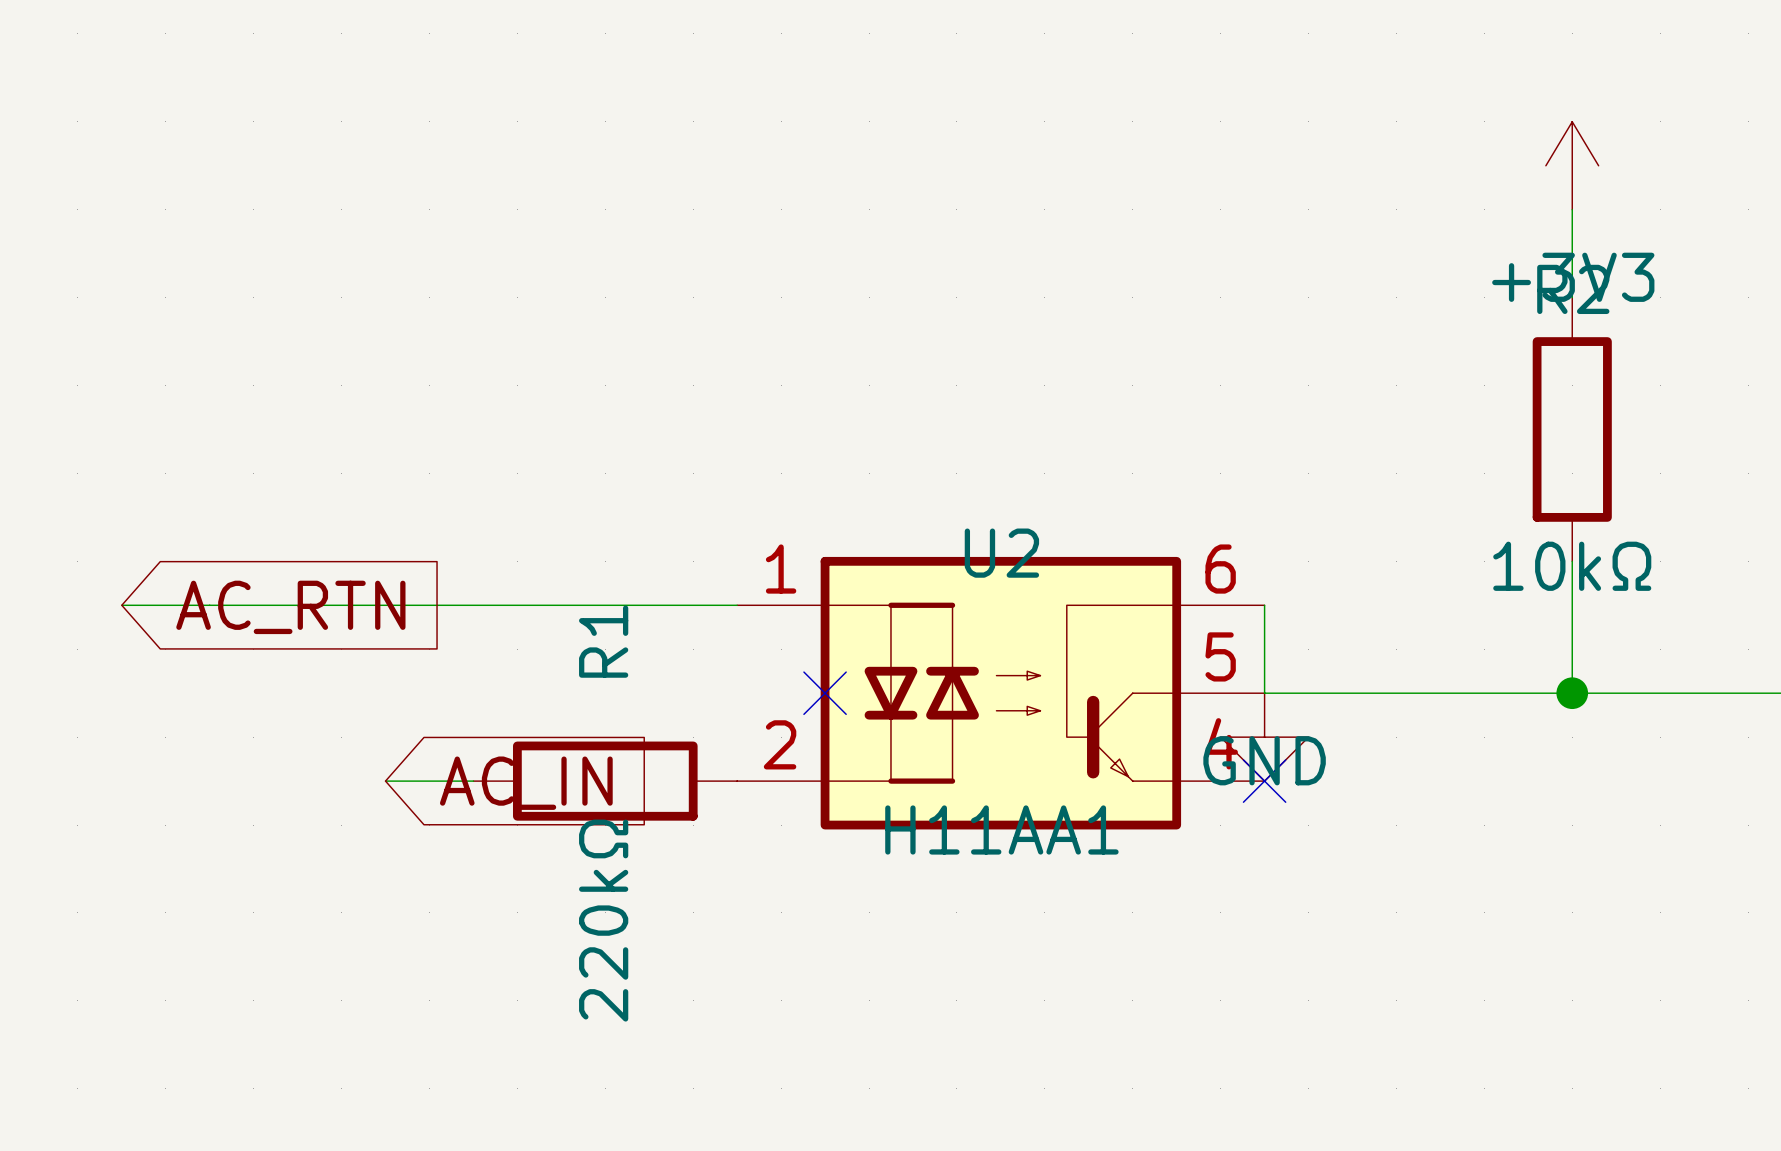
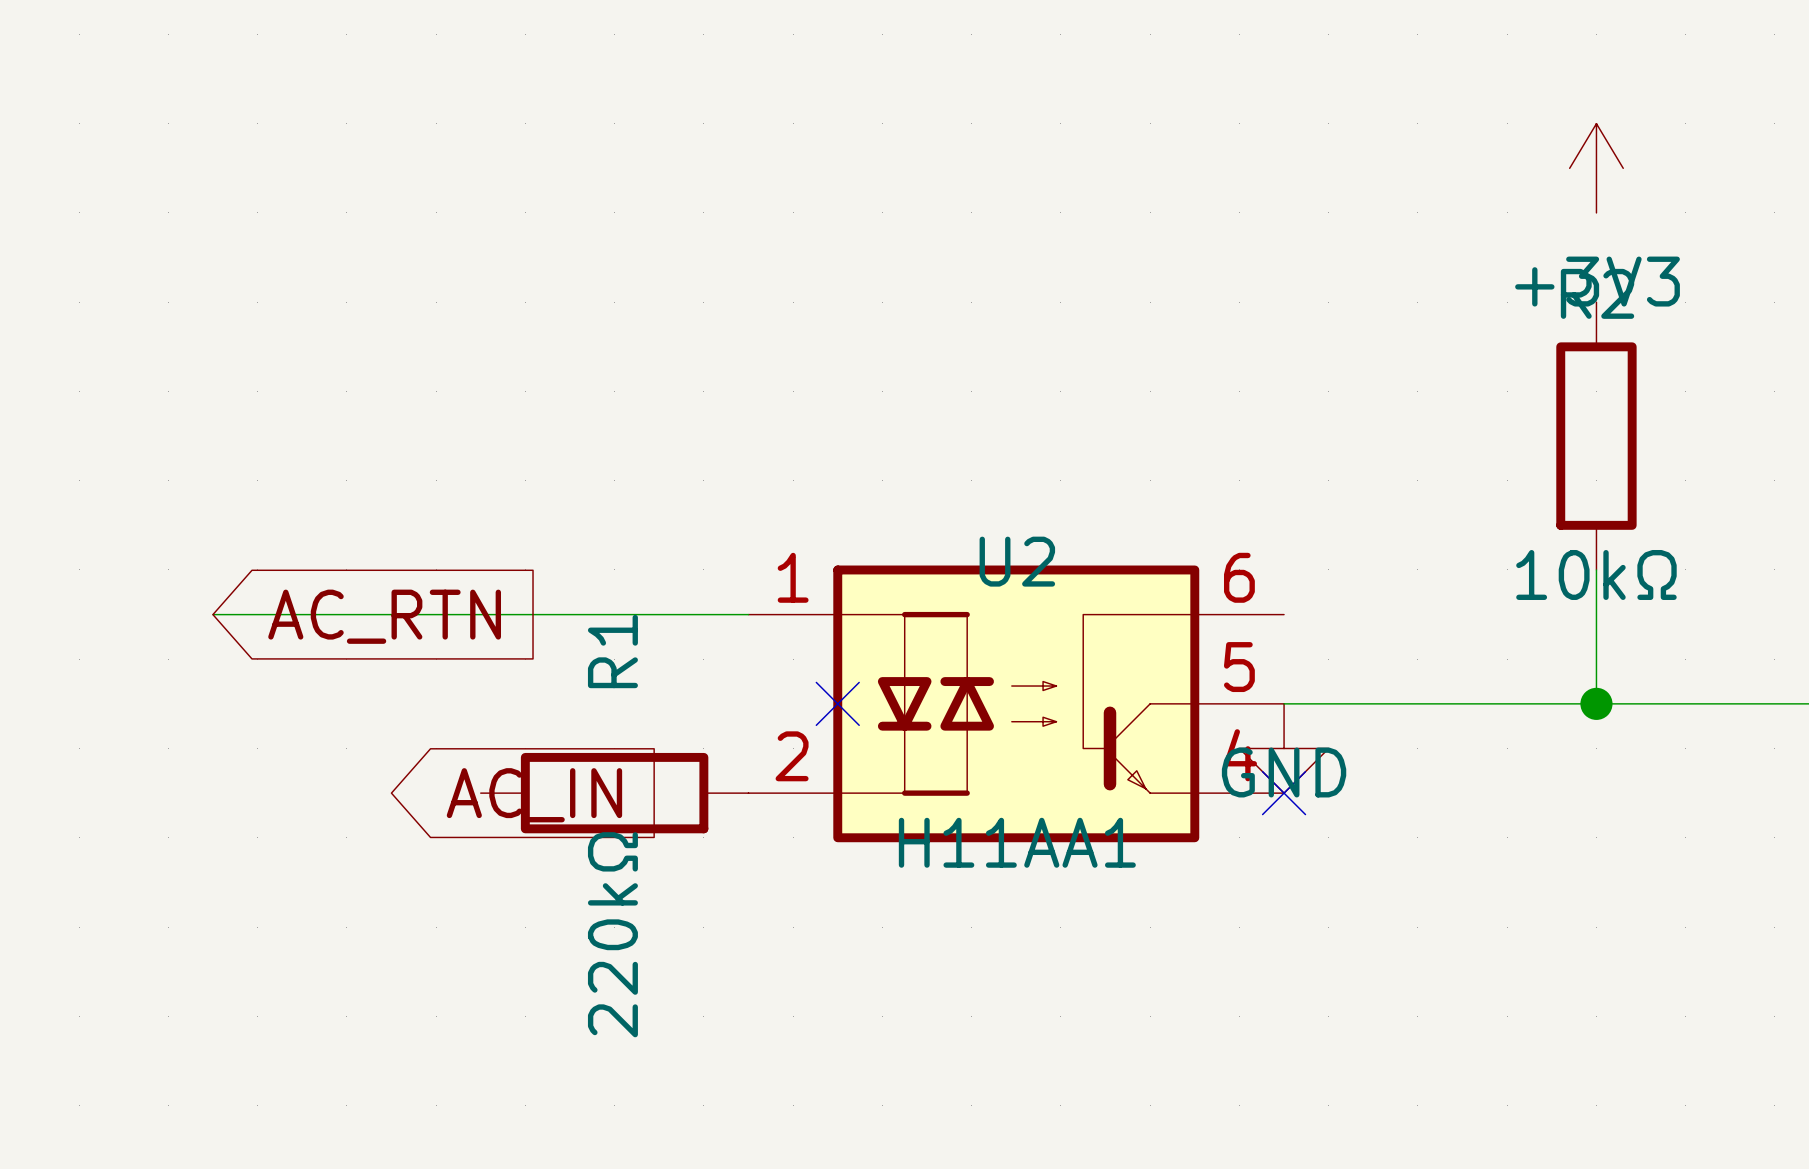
wire: (1572, 209) (1572, 297) -> none
wire: (121, 605) (209, 605) -> none
wire: (1264, 605) (1264, 693) -> none
global label position: AC_RTN (290, 607) -> AC_RTN (384, 616)
wire: (385, 781) (473, 781) -> none

